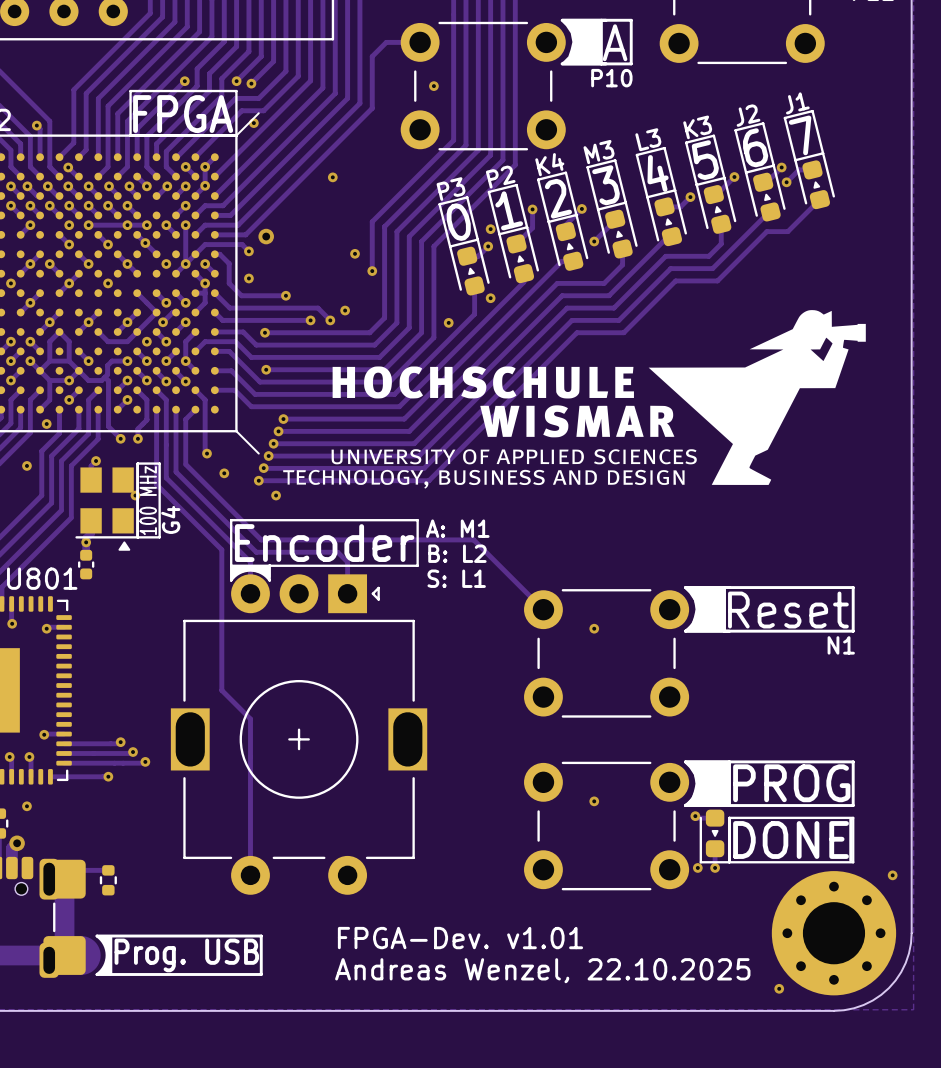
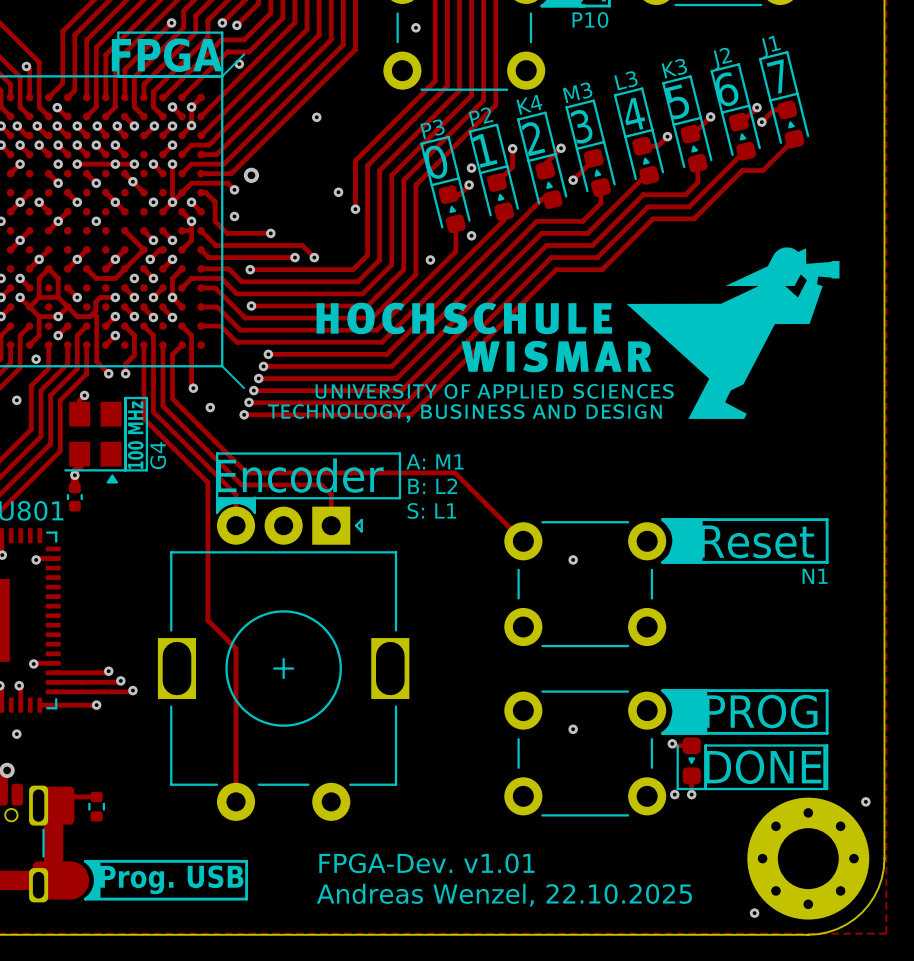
via: (345, 310) -> none
via: (135, 495) -> none
via: (276, 495) -> none

